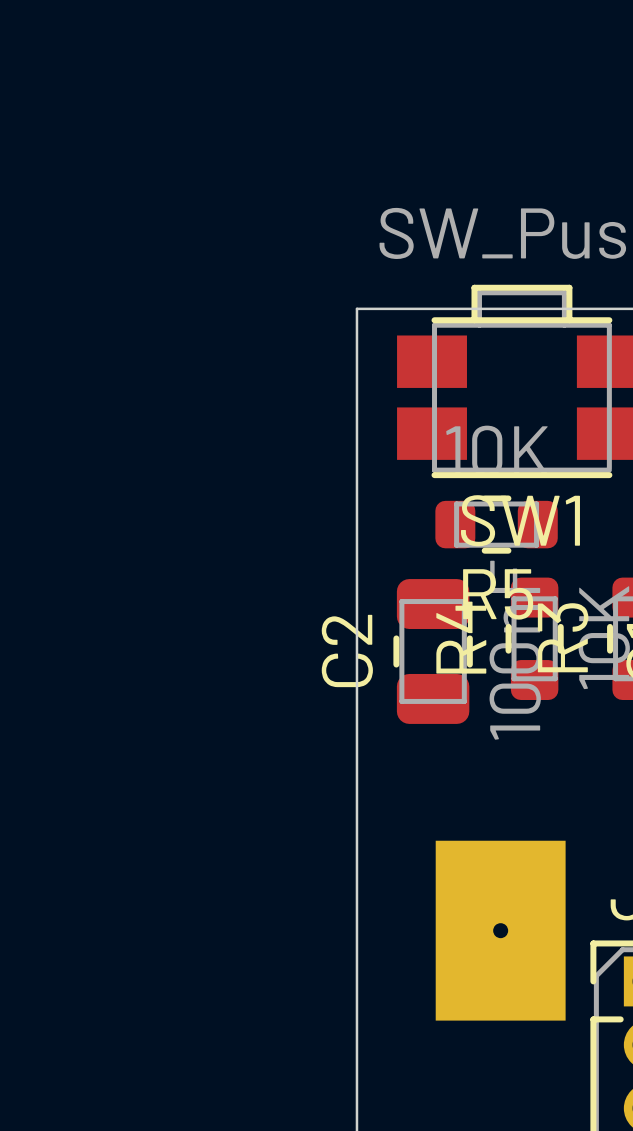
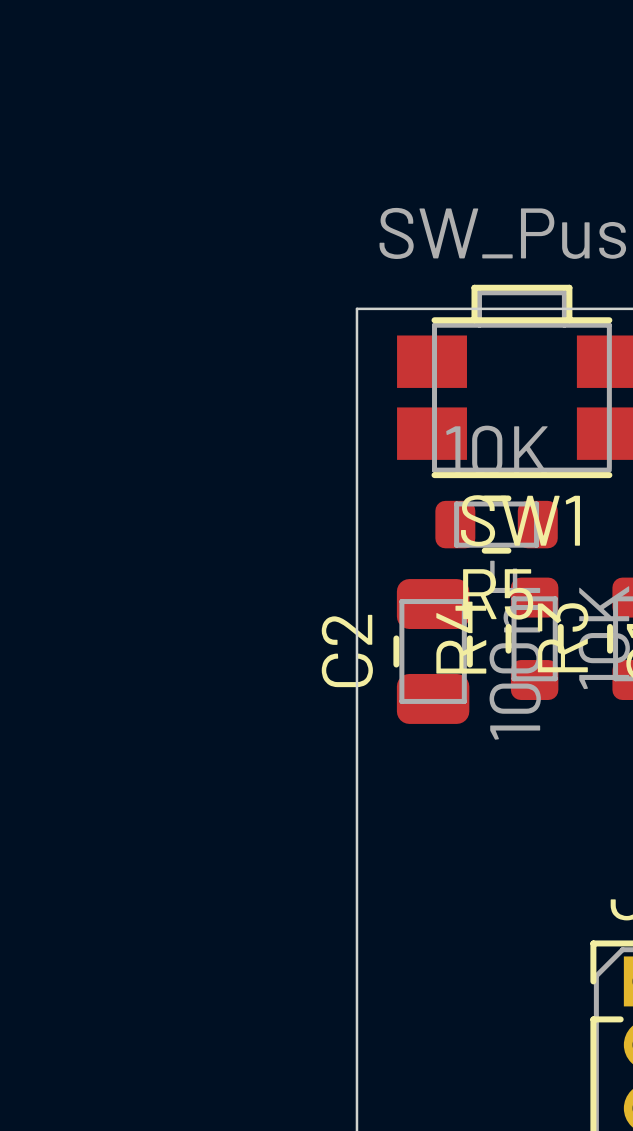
part: (500, 930) -> none

